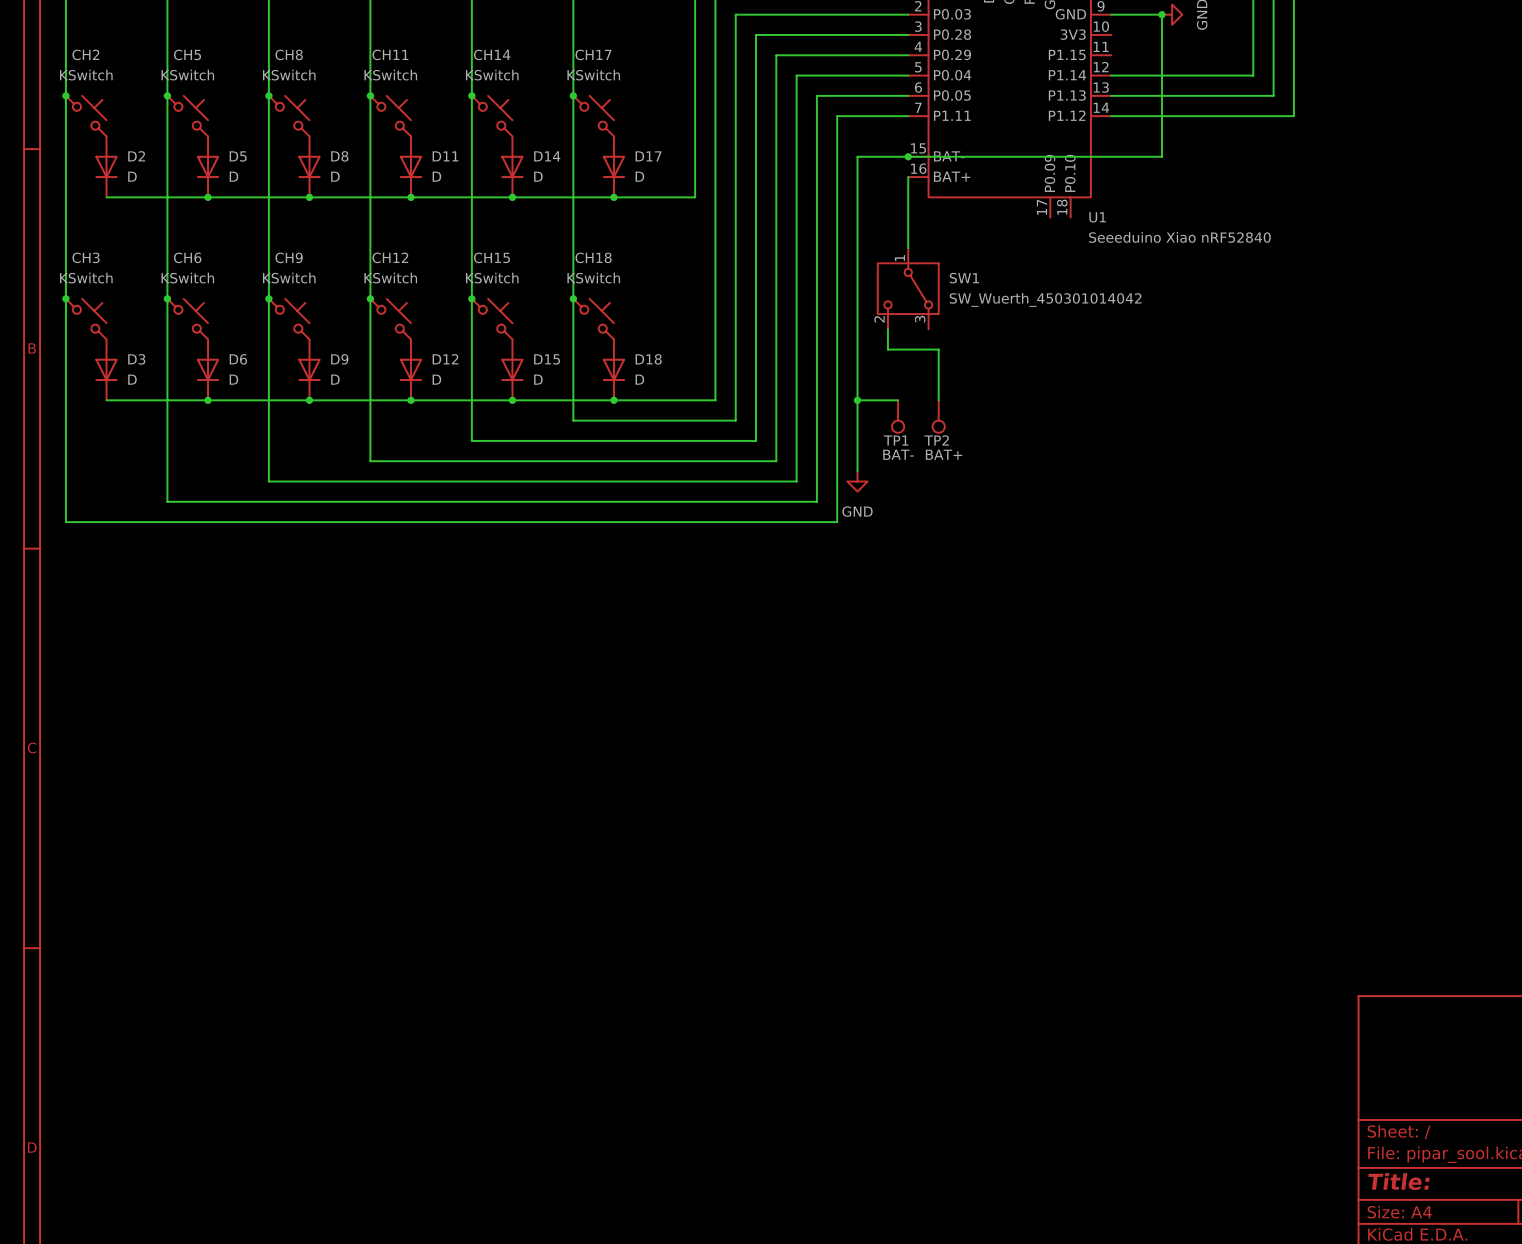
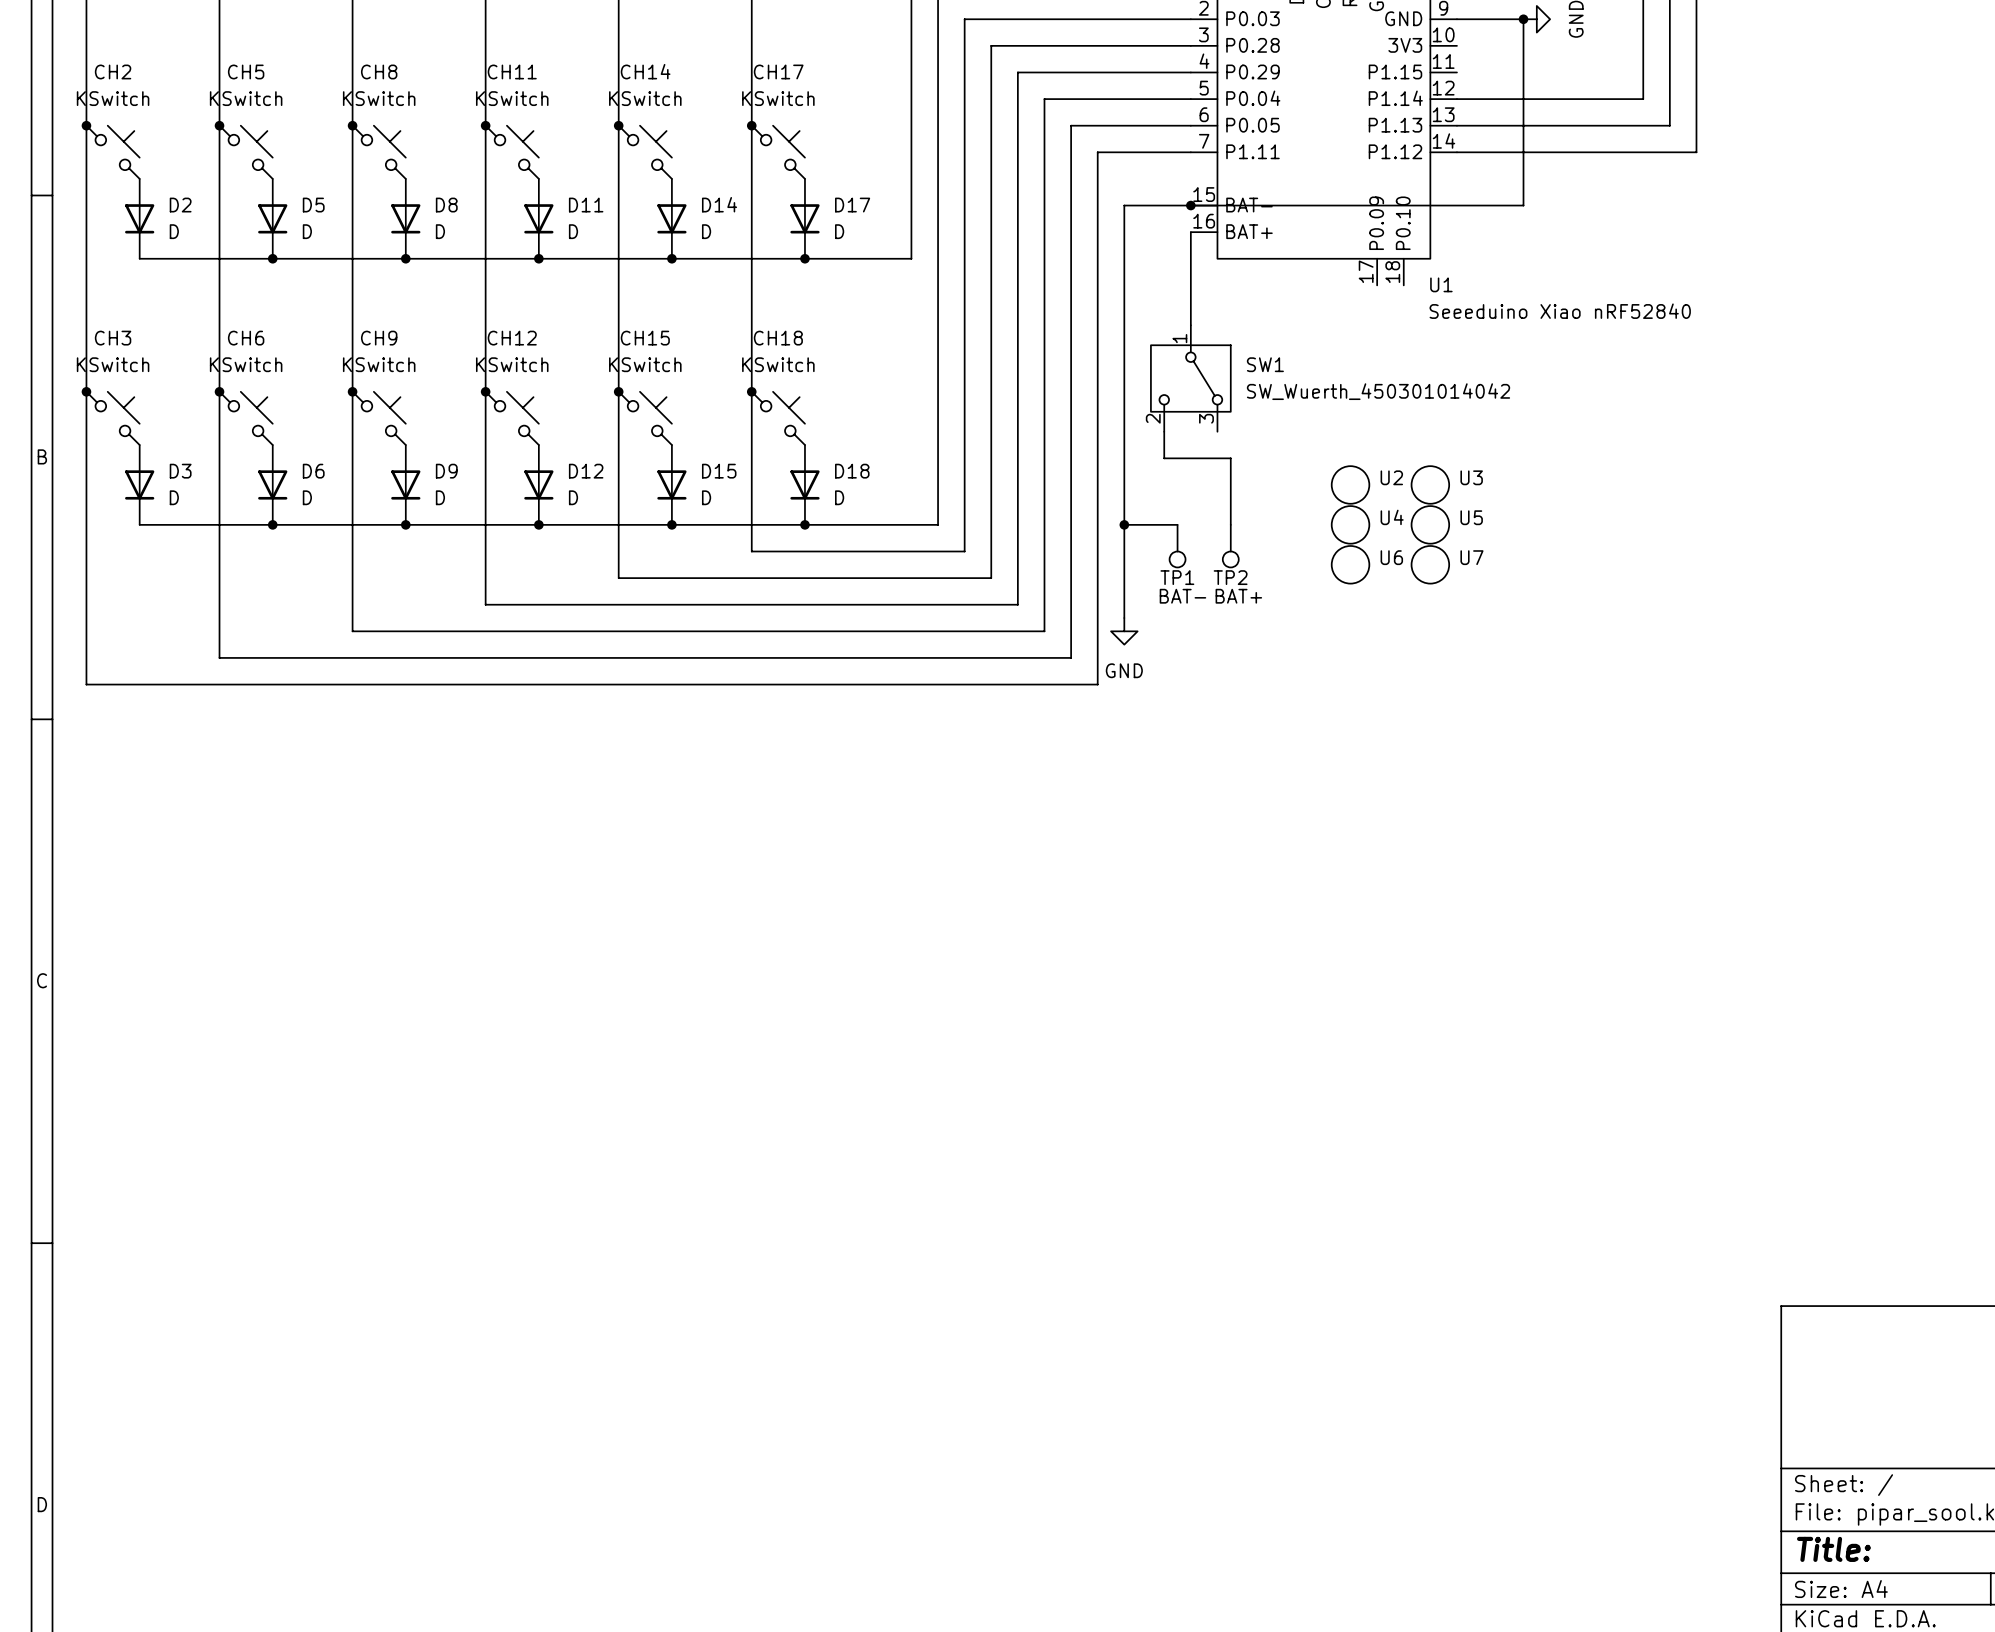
U2: none -> (1350, 484)
U3: none -> (1430, 484)
U4: none -> (1350, 524)
U5: none -> (1430, 524)
U6: none -> (1350, 564)
U7: none -> (1430, 564)

